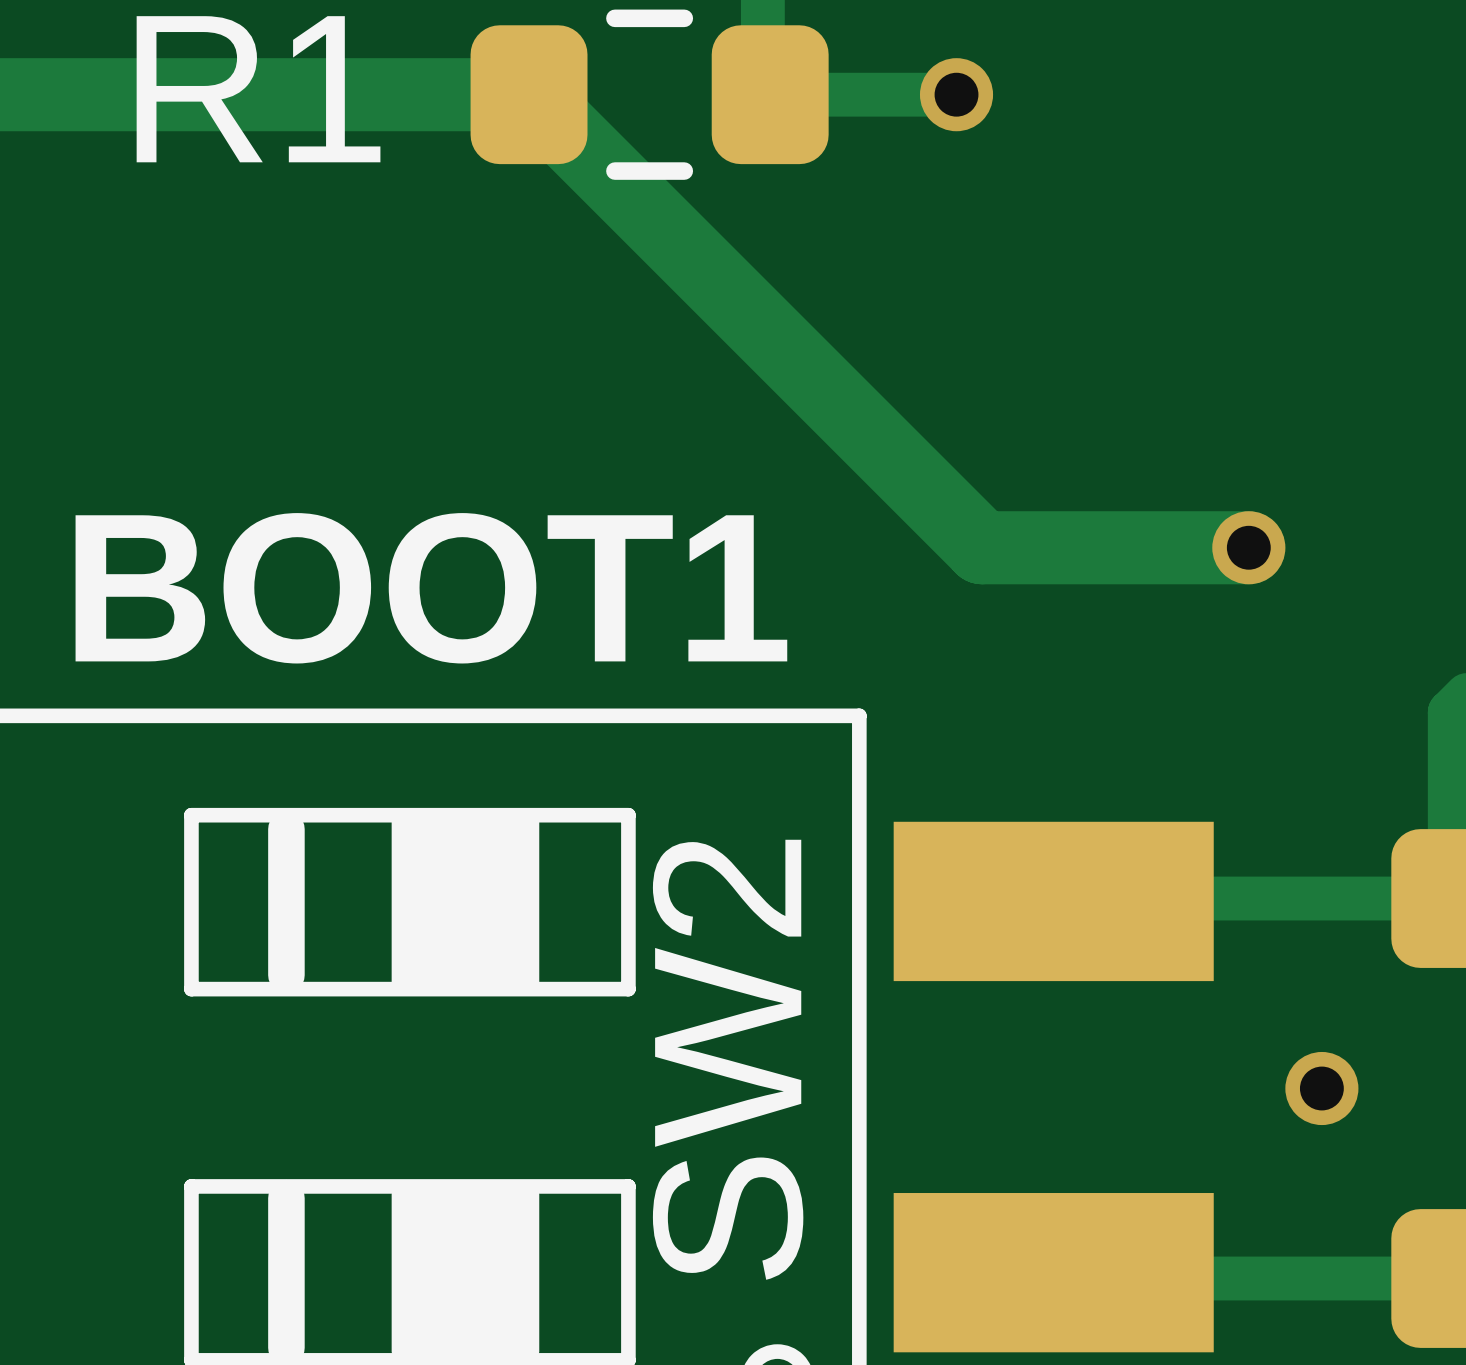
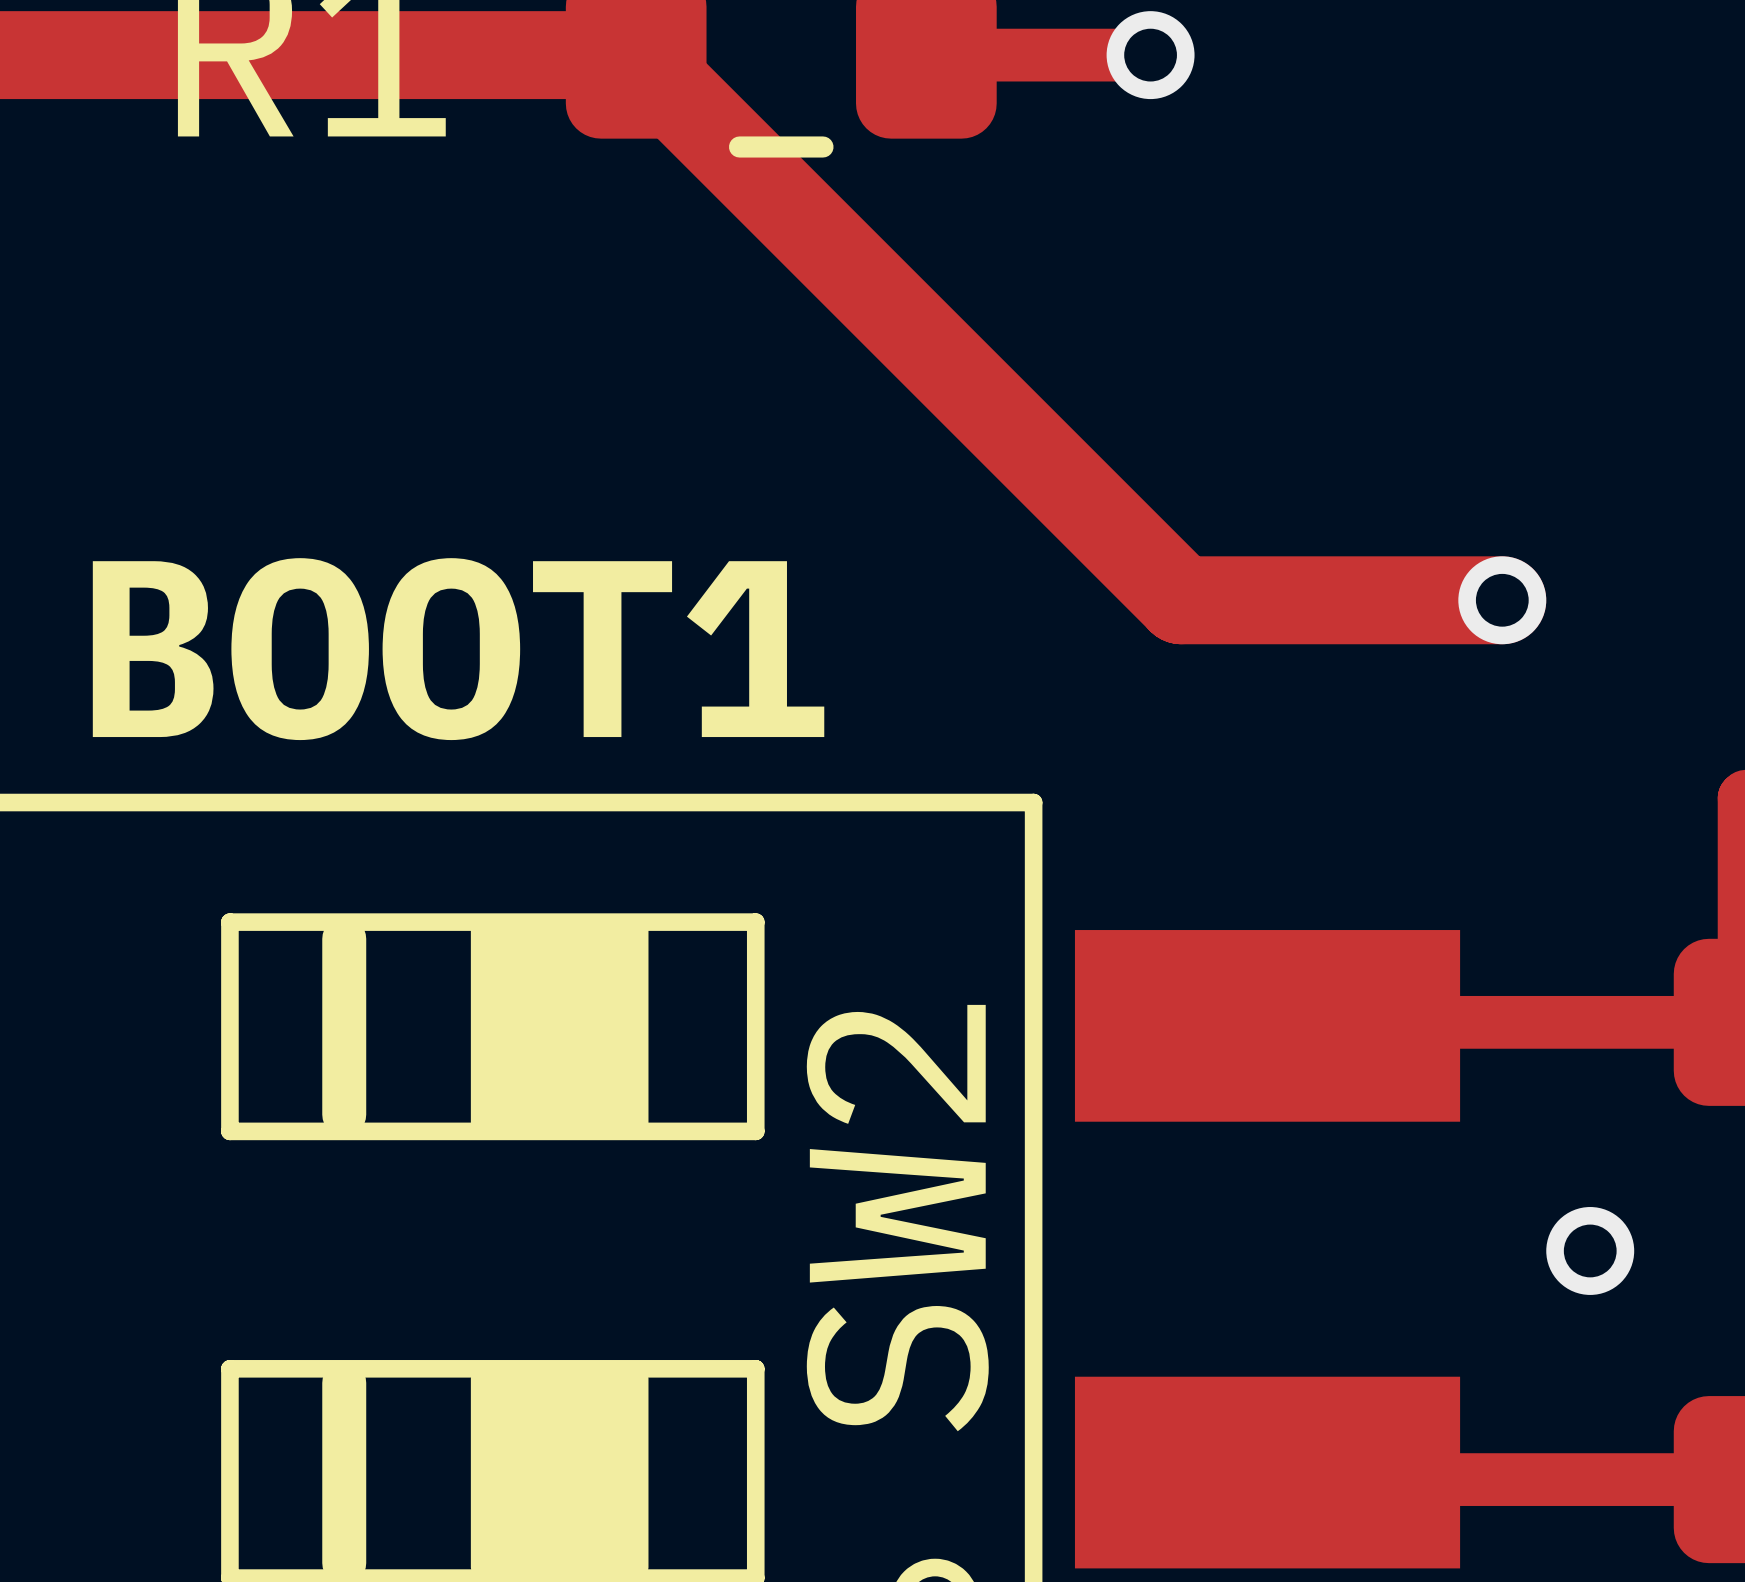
SW2 name position: SW2 (728, 1059) -> SW2 (897, 1218)

